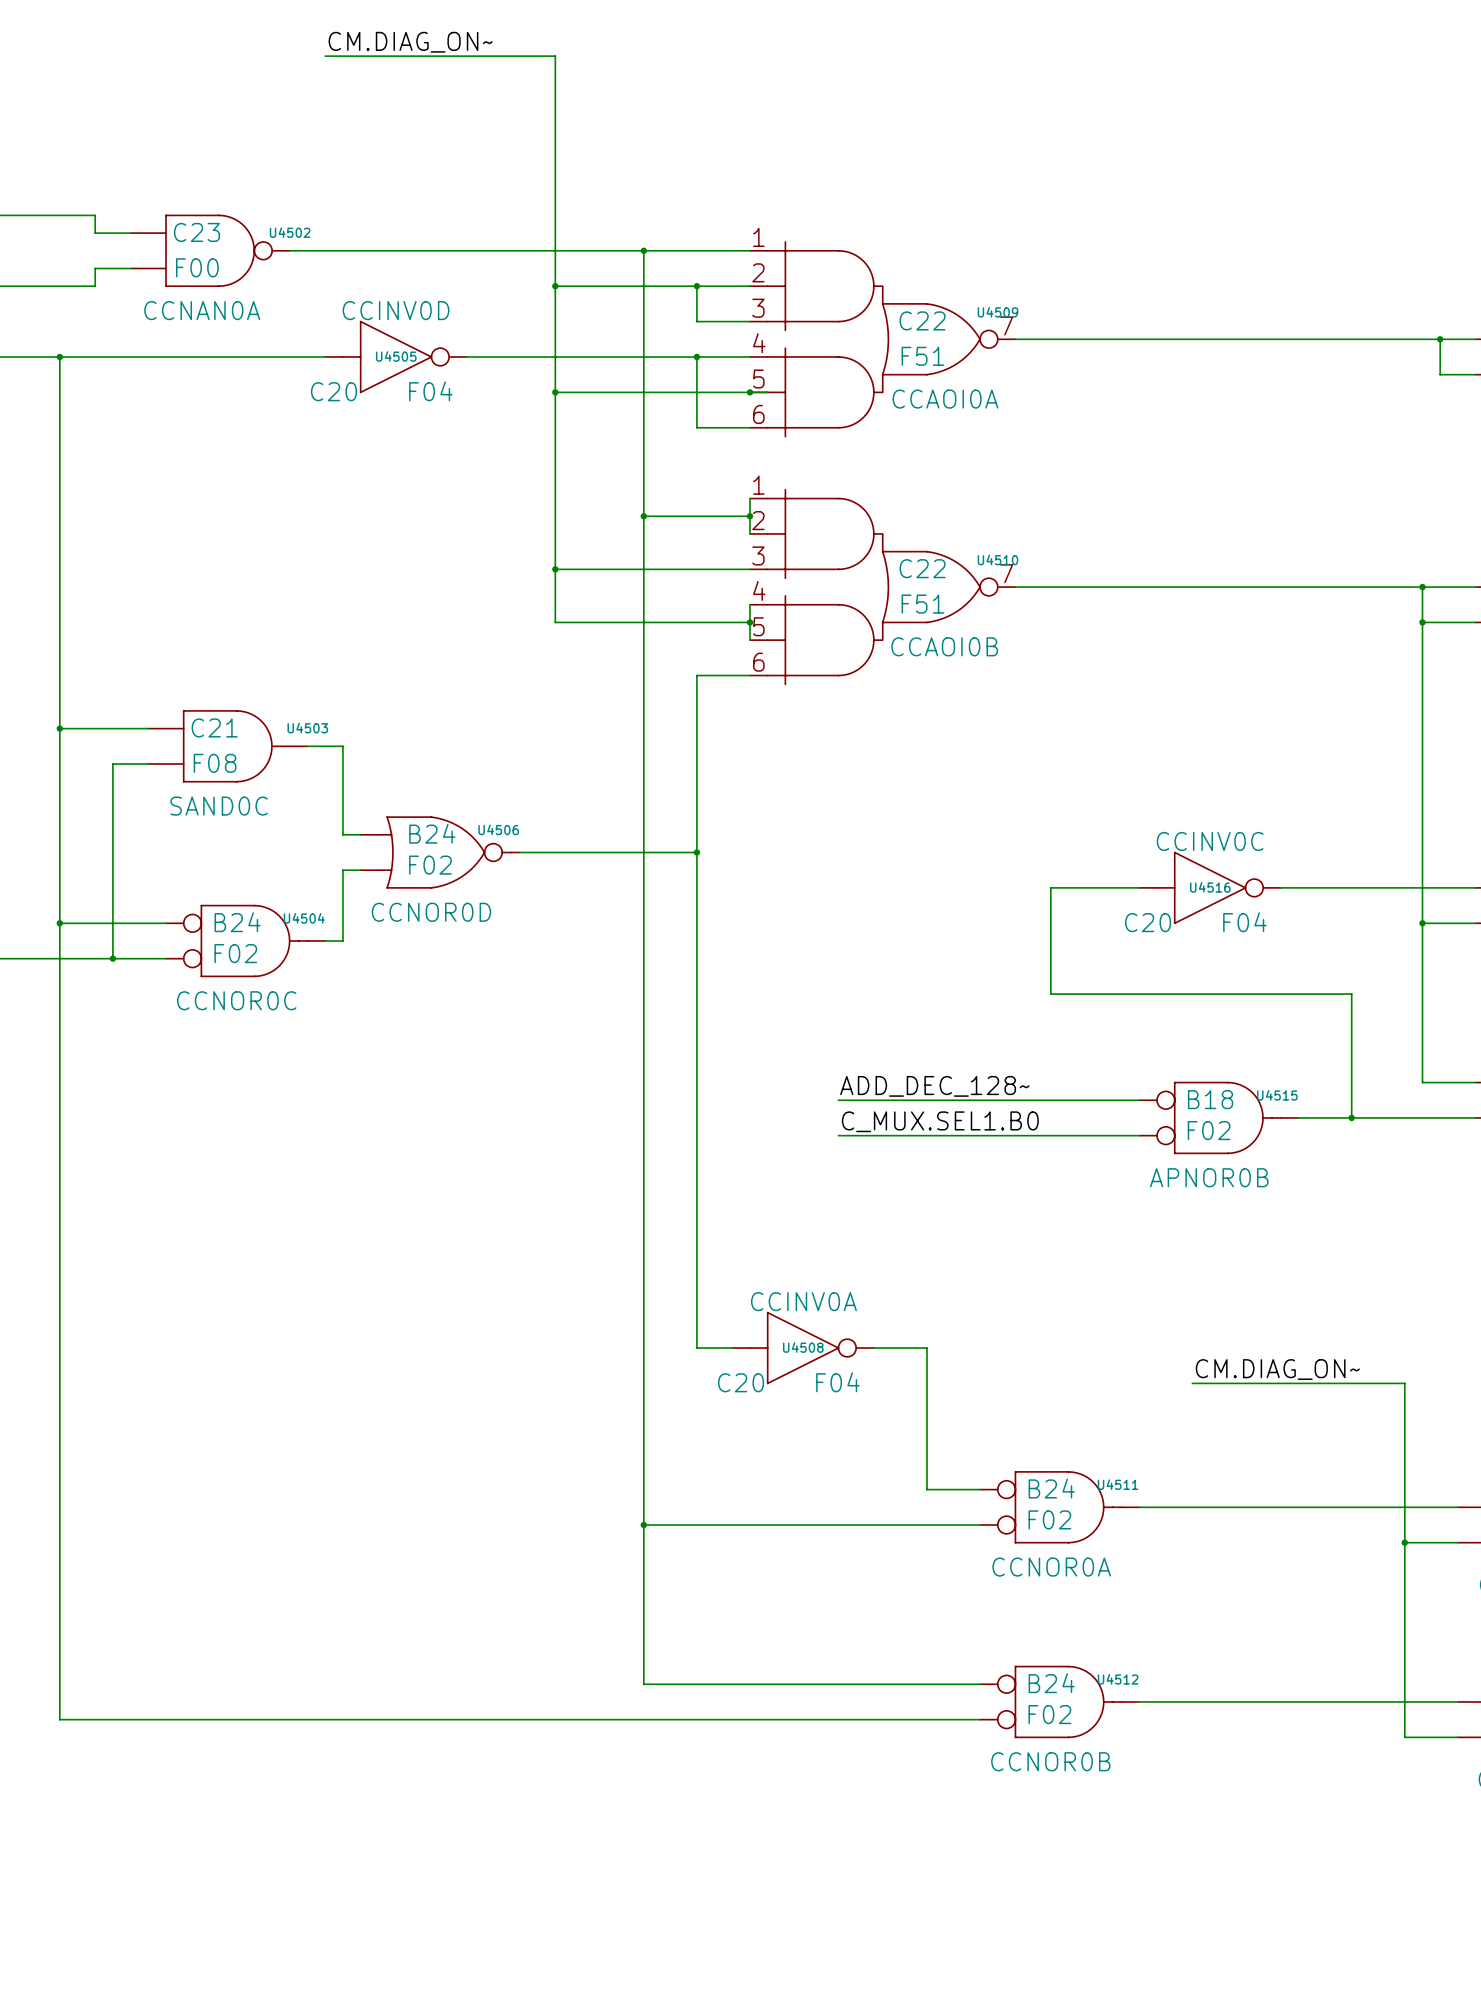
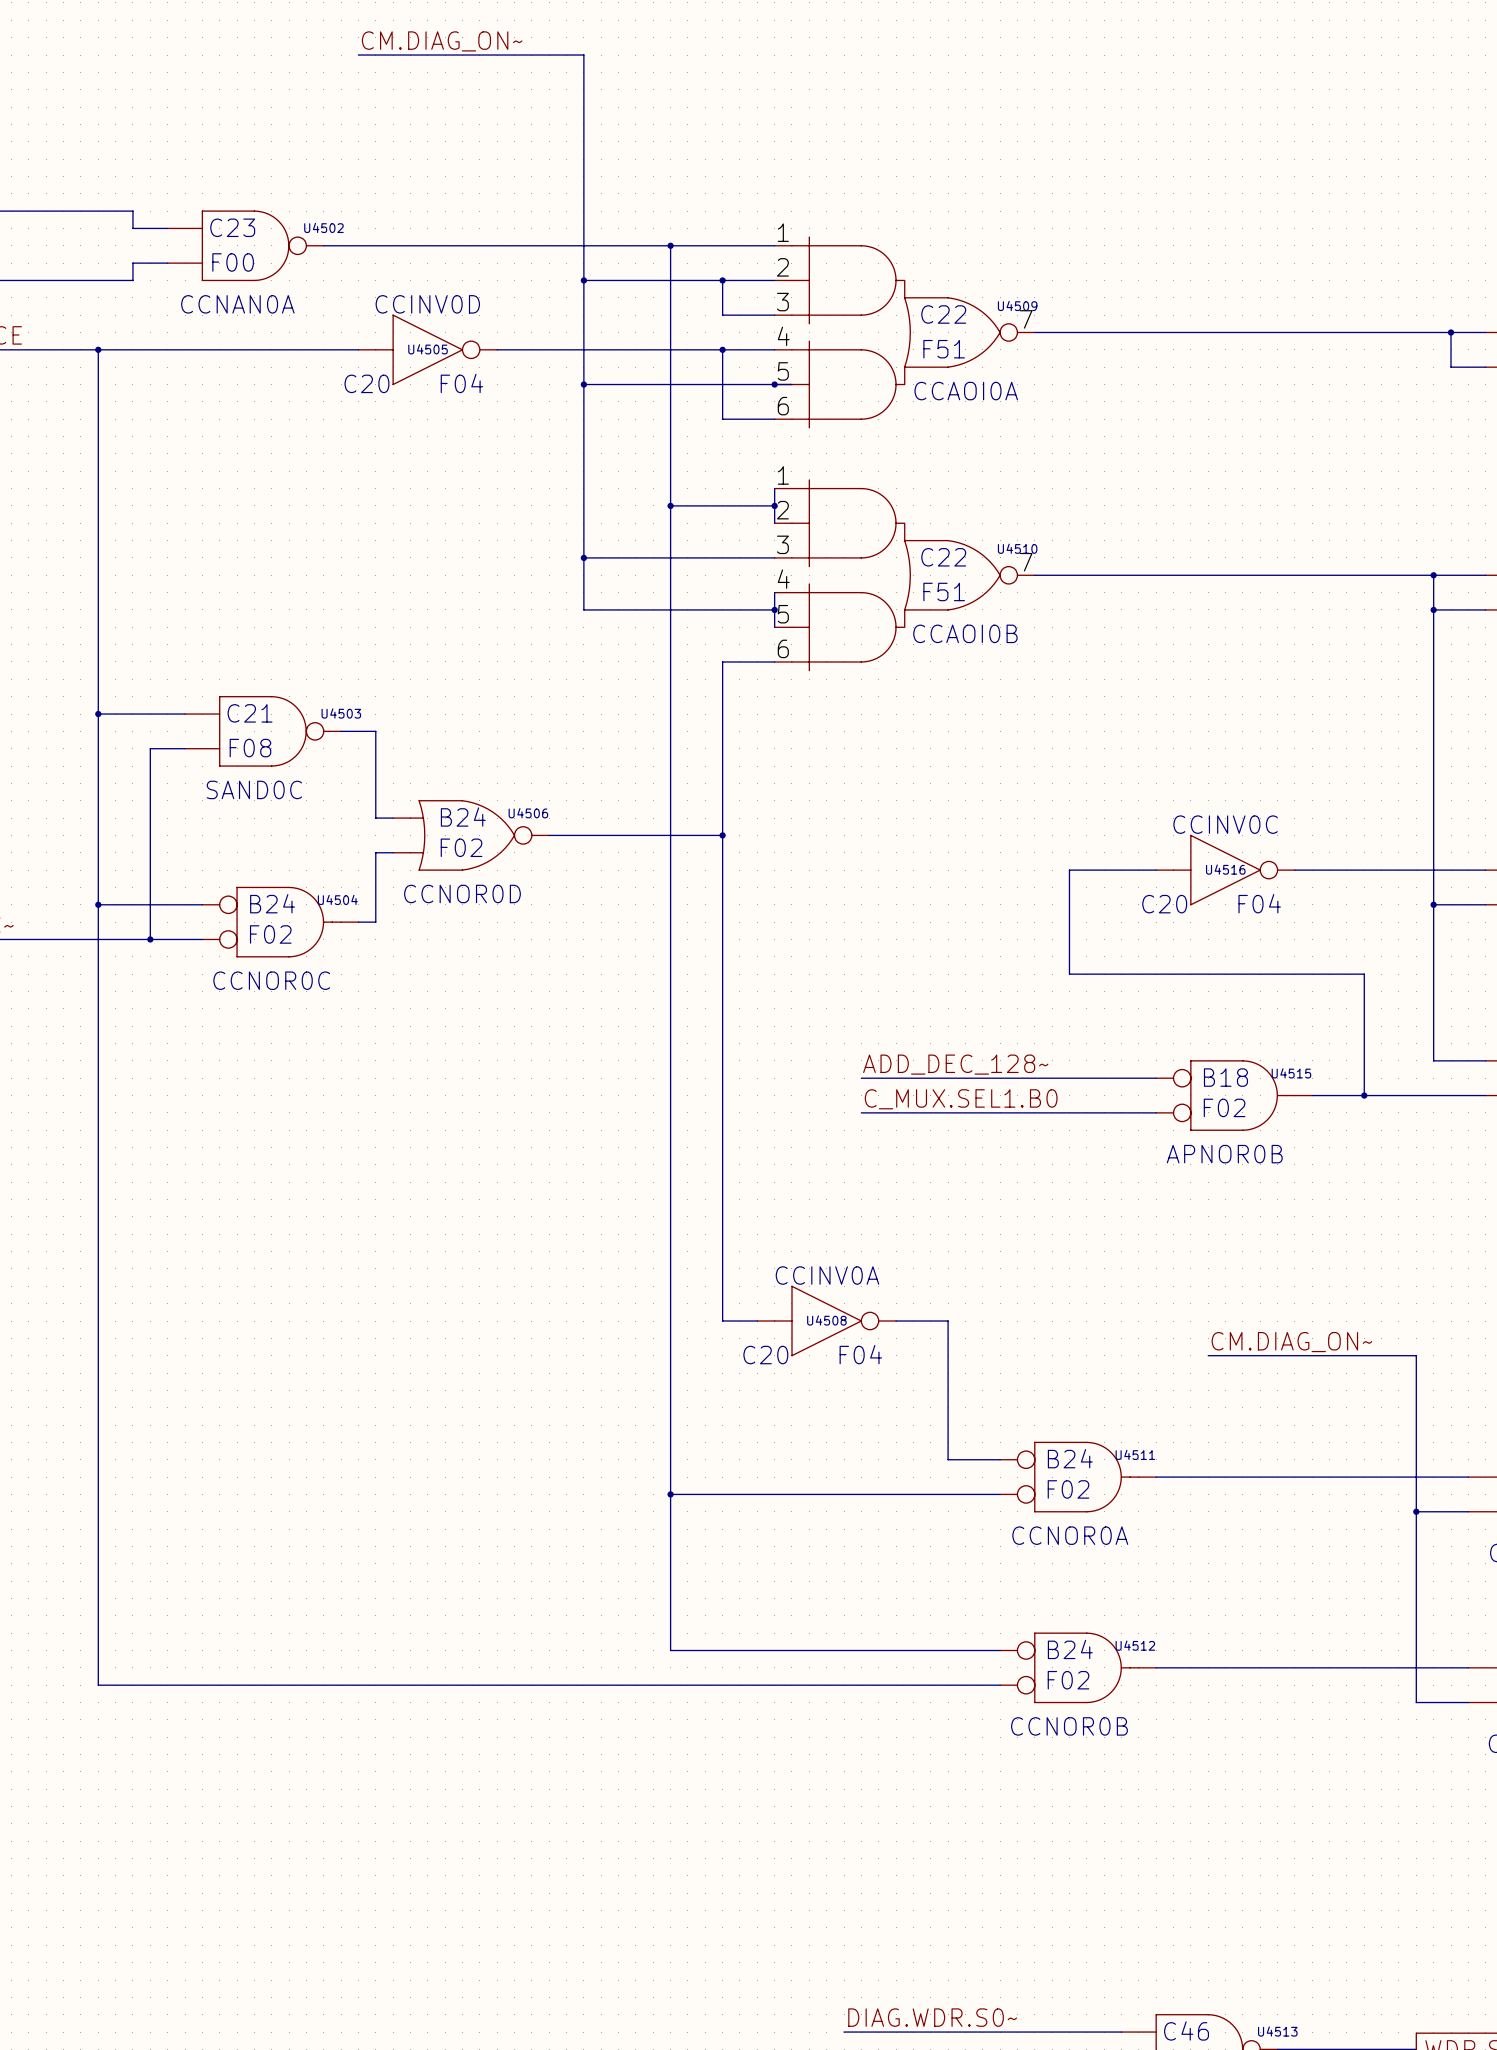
U4503 symbol: [148, 710, 308, 783] -> [185, 696, 342, 767]

